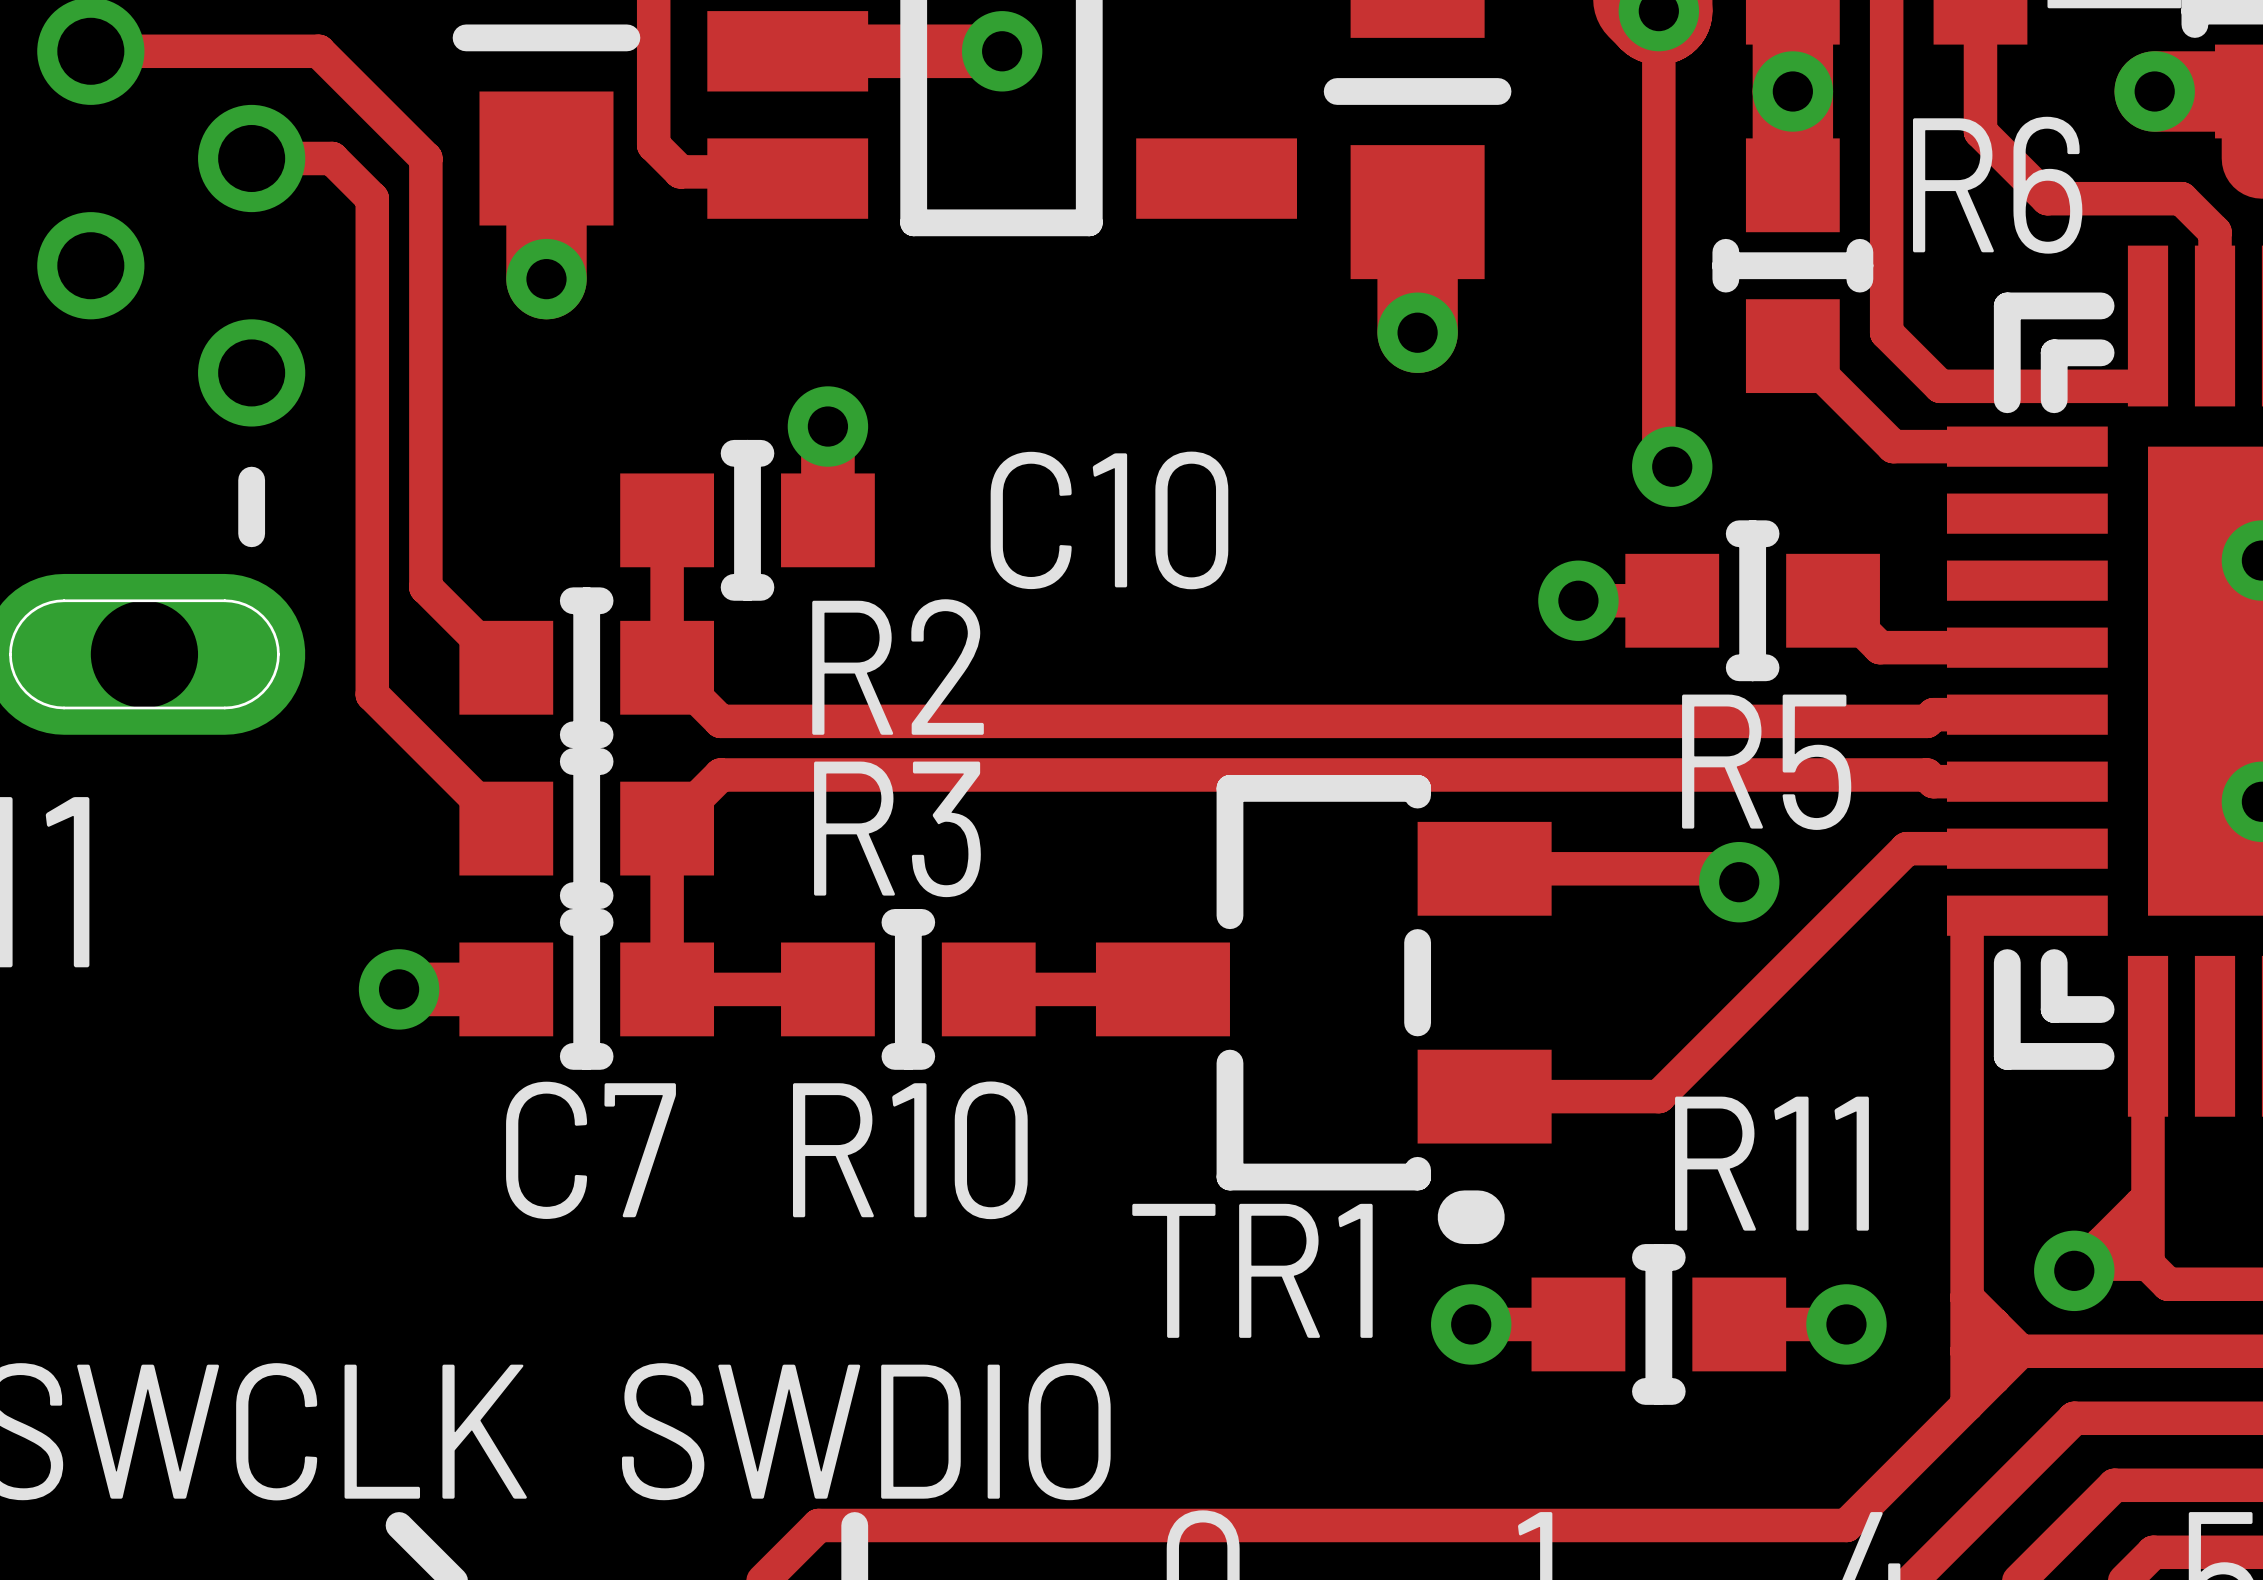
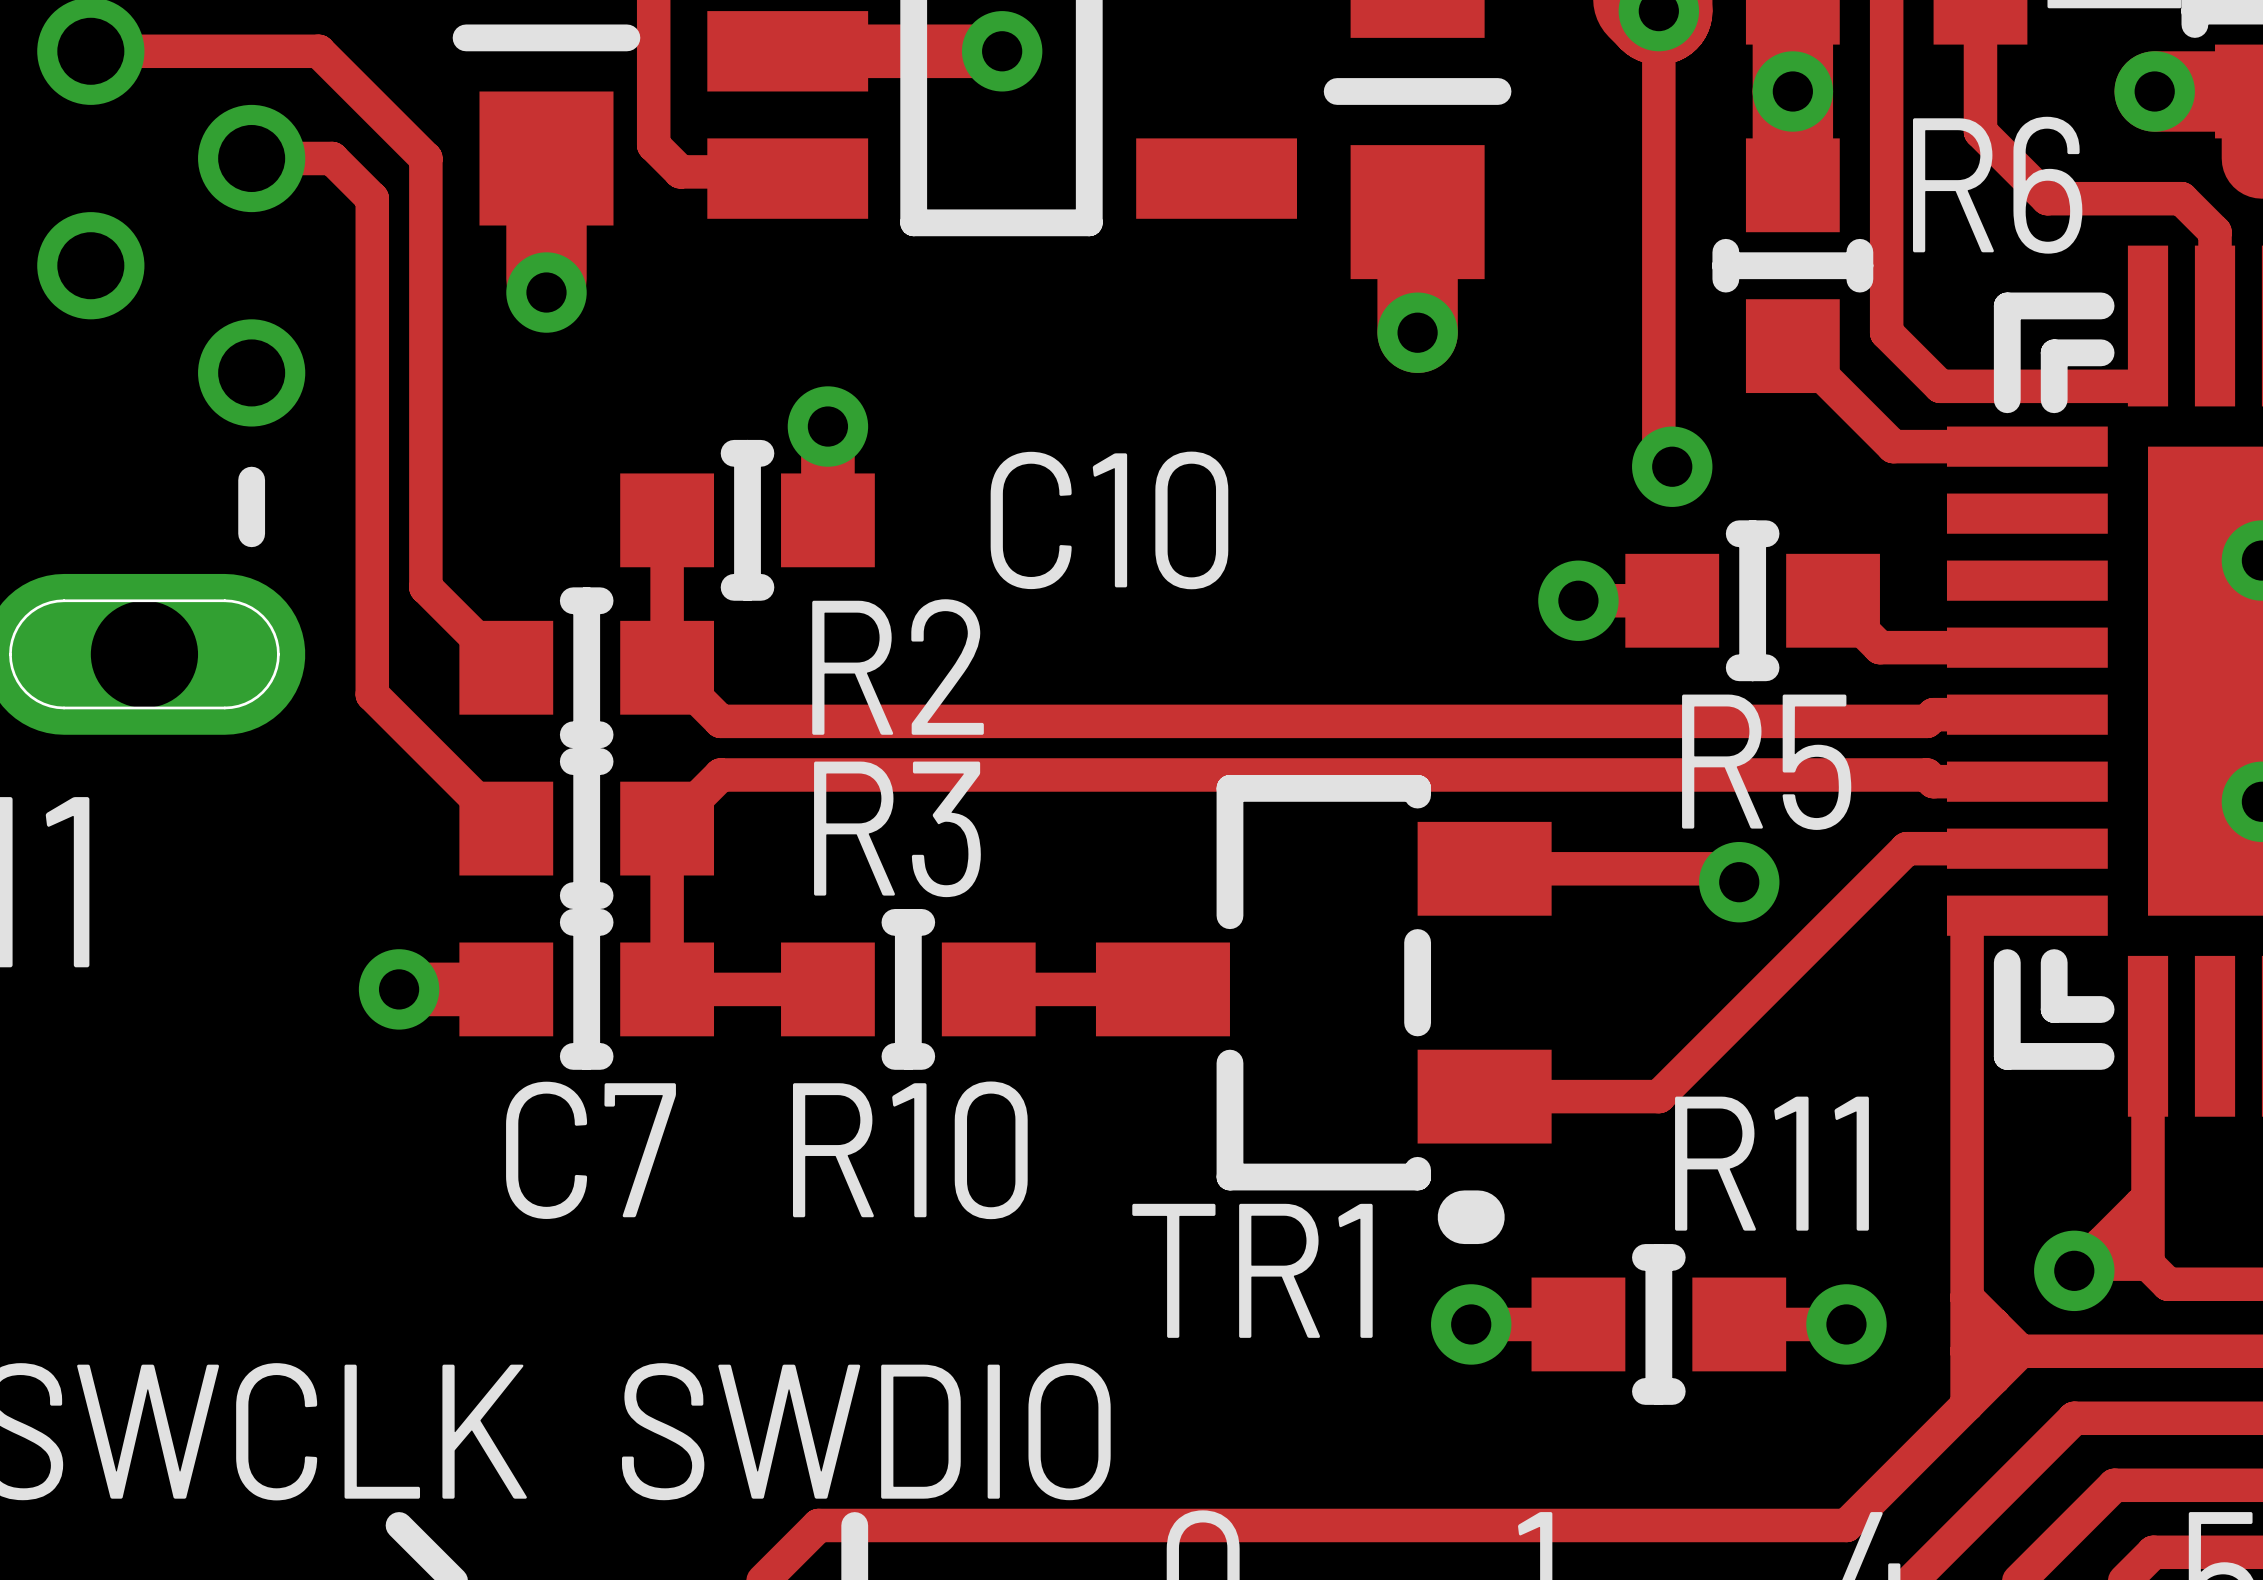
via position: (546, 279) -> (546, 292)

